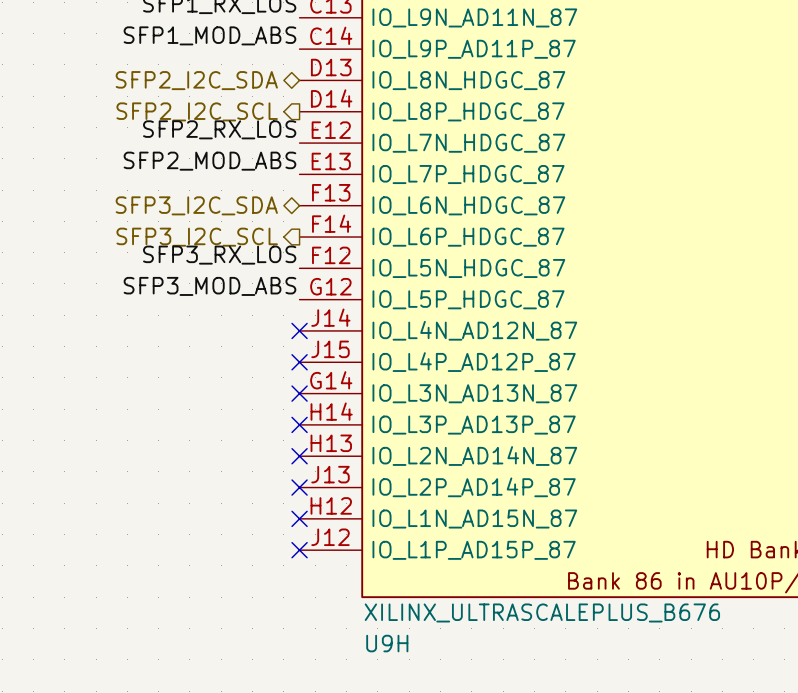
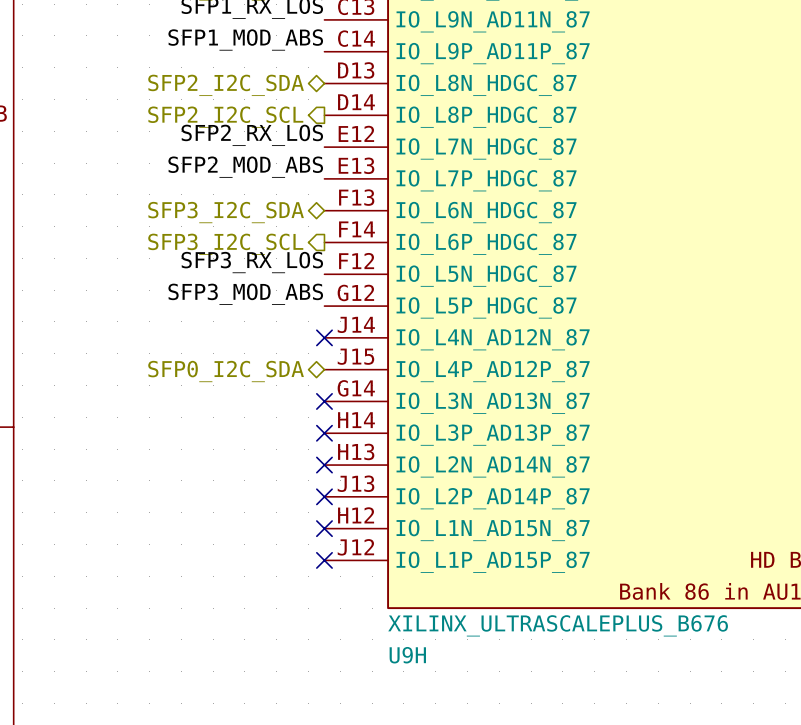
hierarchical label: none -> SFP0_I2C_SDA (226, 371)
no-connect mark: (299, 362) -> none

